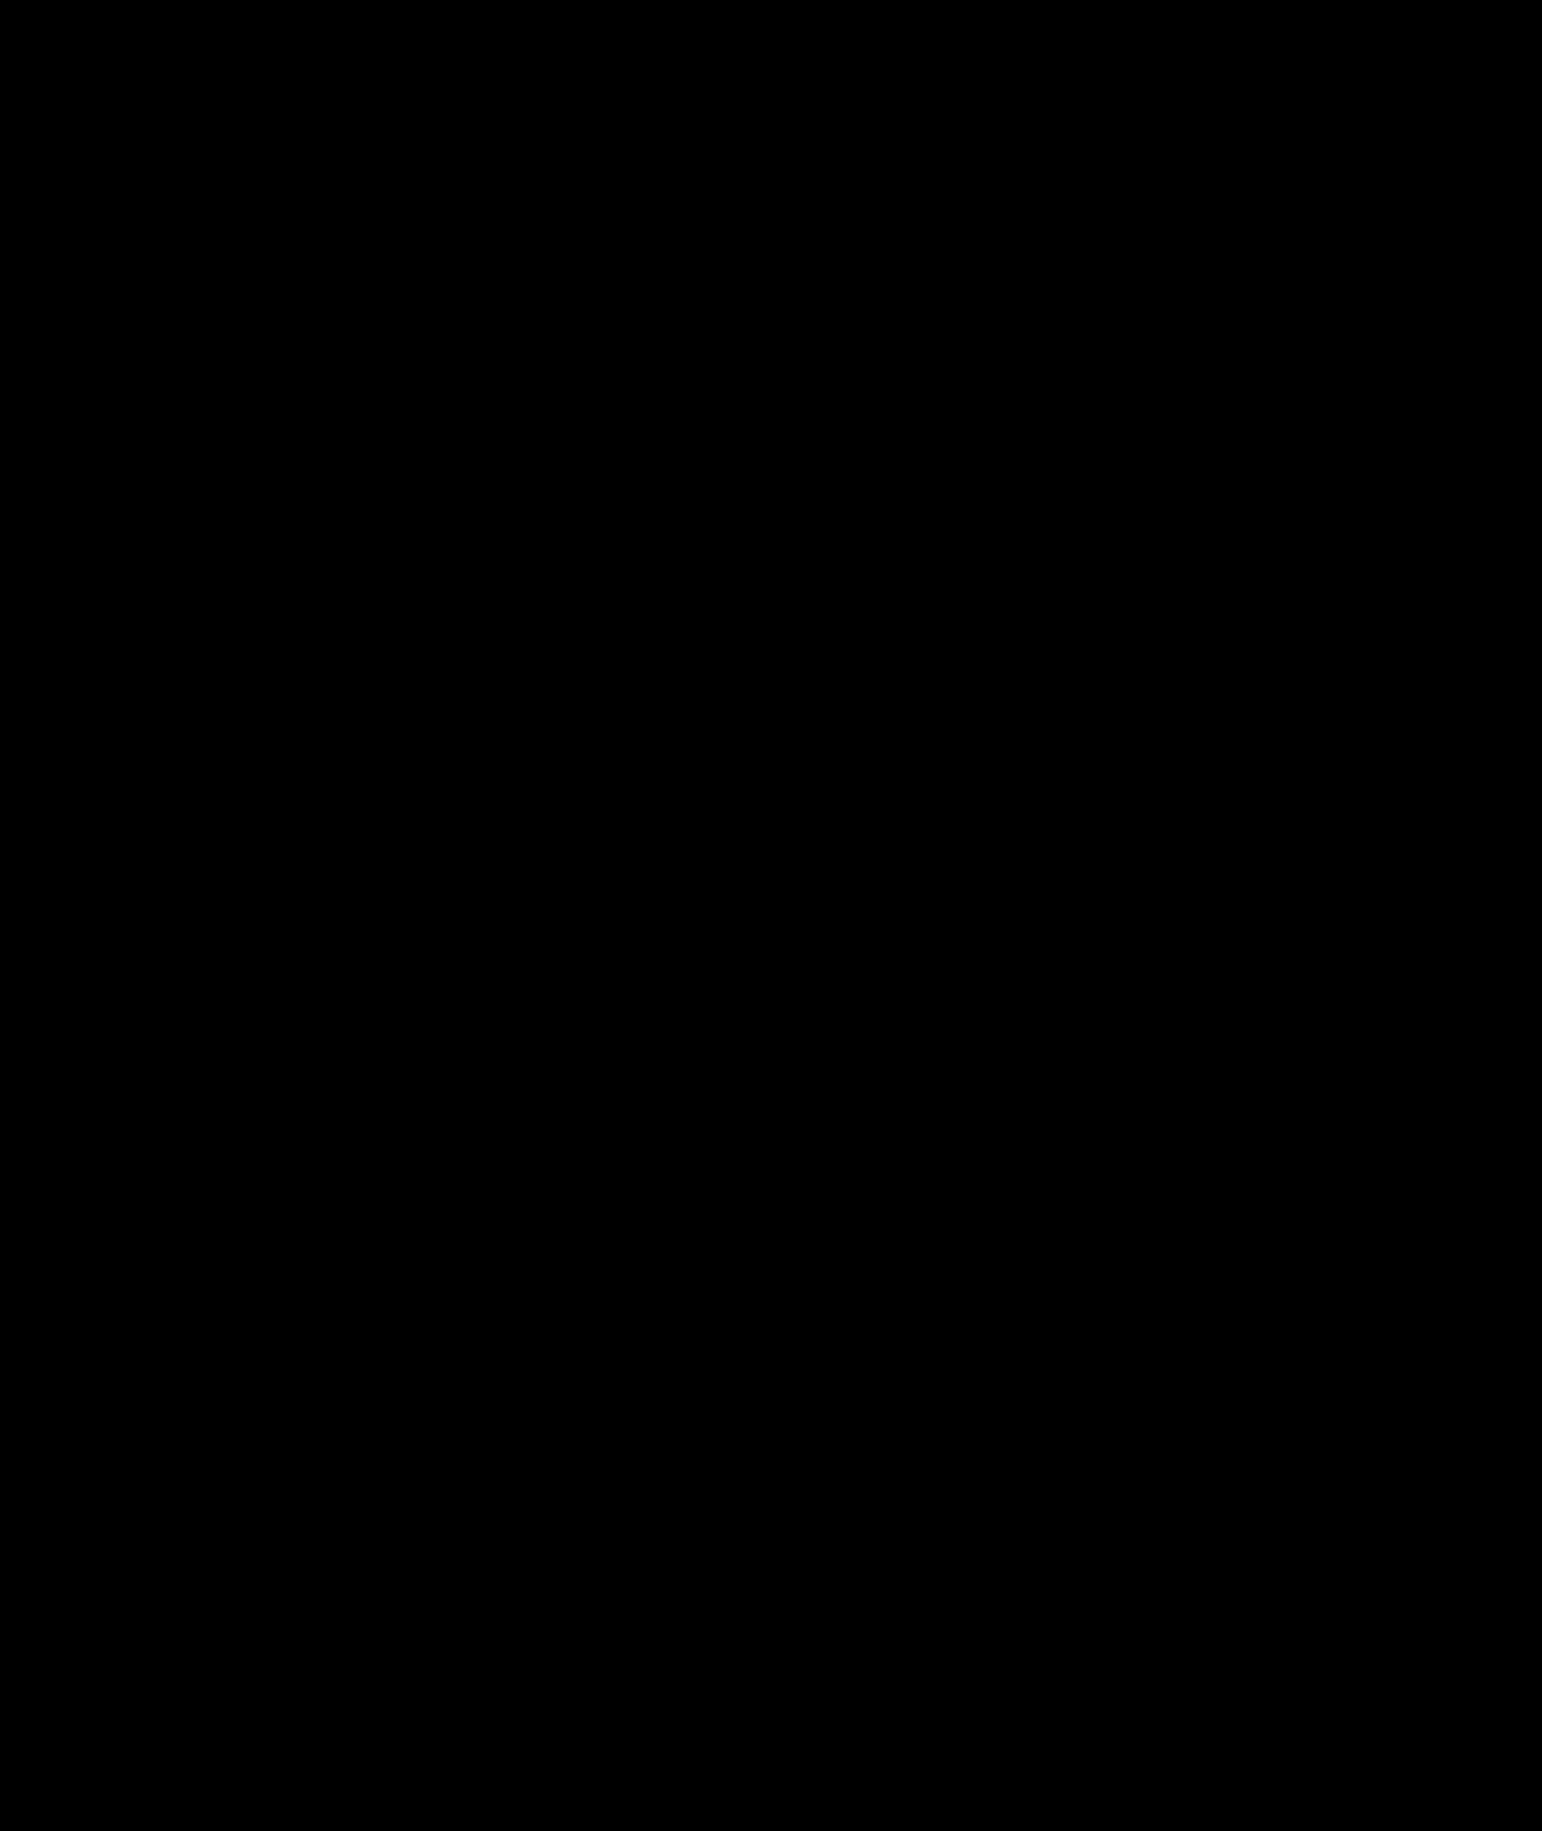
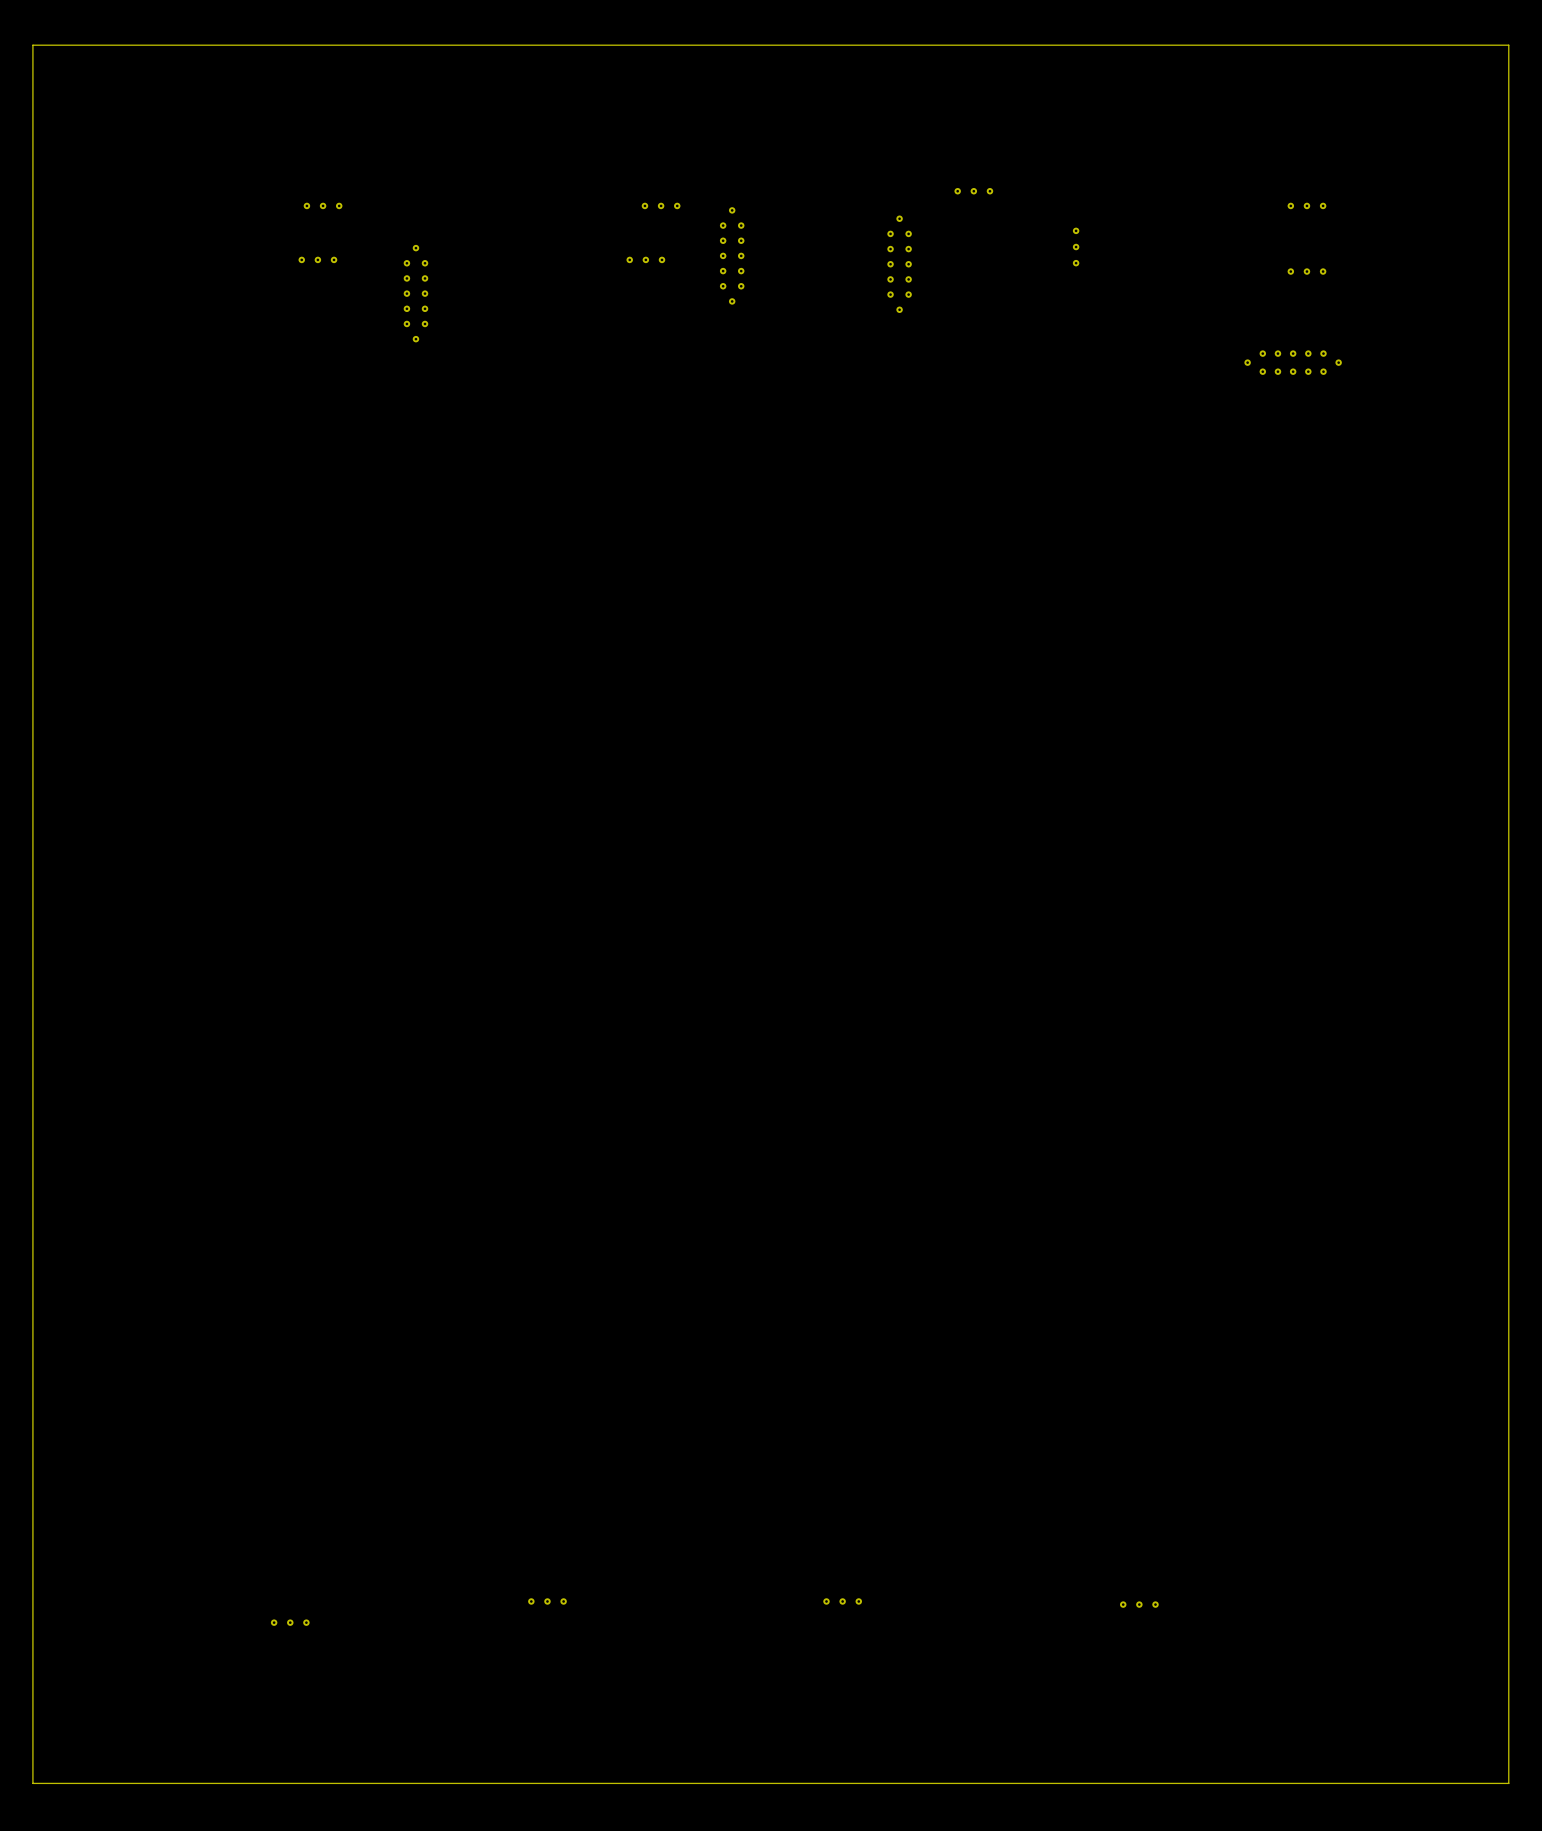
board edge: none -> (1508, 45) (32, 45) (32, 1783) (1508, 1783) (1508, 45)
part: none -> (973, 191)
part: none -> (323, 205)
part: none -> (661, 205)
part: none -> (1306, 205)
part: none -> (1076, 247)
part: none -> (732, 255)
part: none -> (317, 259)
part: none -> (645, 259)
part: none -> (899, 264)
part: none -> (1306, 271)
part: none -> (415, 293)
part: none -> (1293, 362)
part: none -> (547, 1601)
part: none -> (842, 1601)
part: none -> (1139, 1604)
part: none -> (290, 1622)

